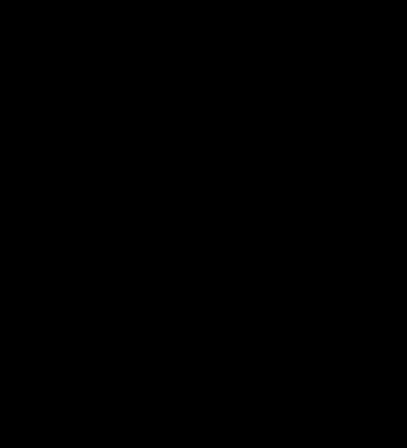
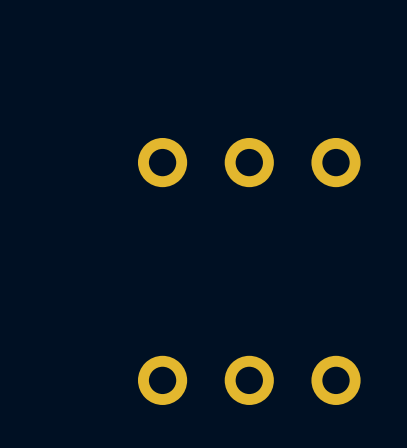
part: none -> (249, 162)
part: none -> (249, 380)

